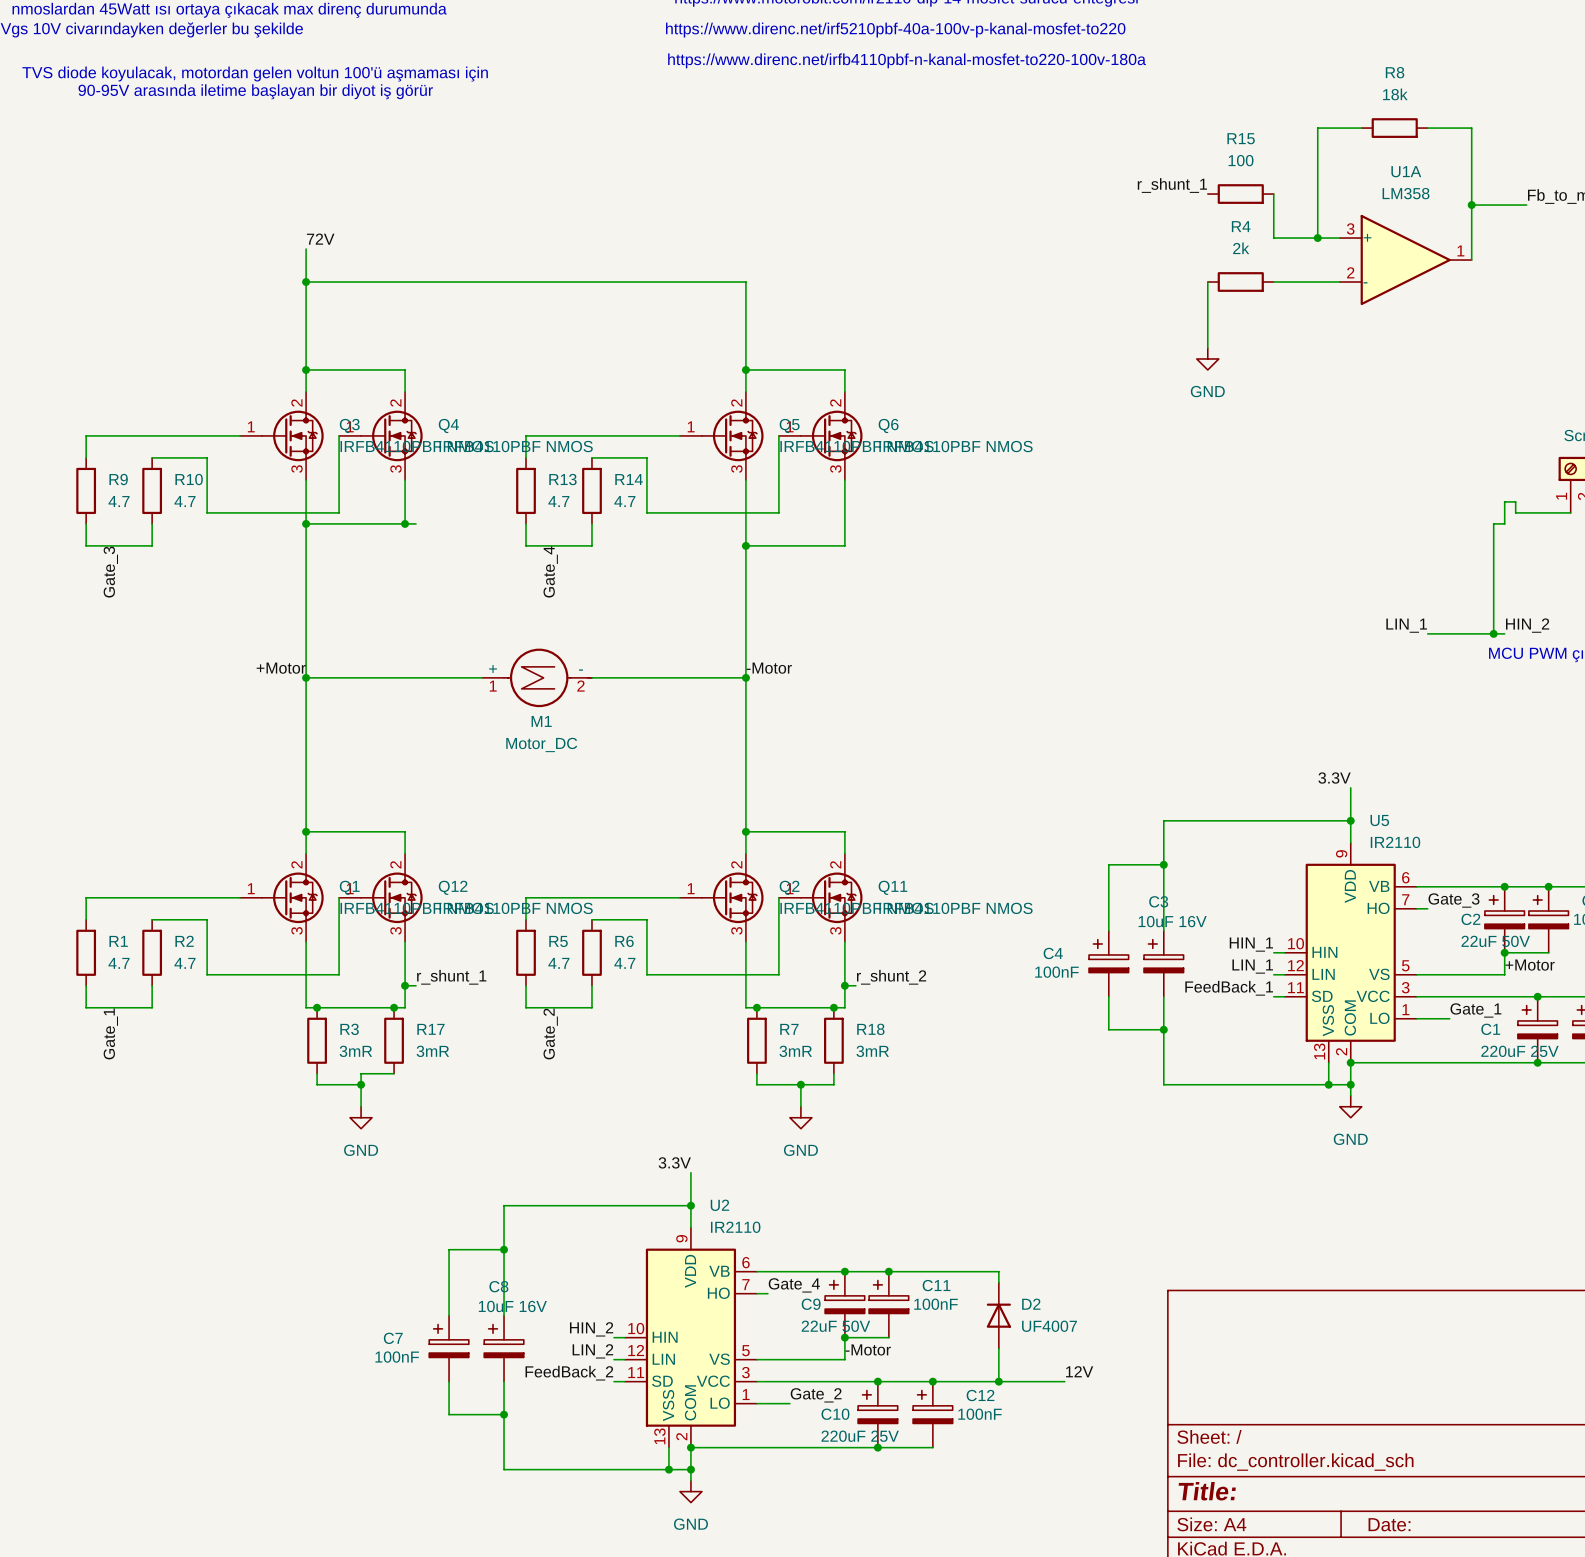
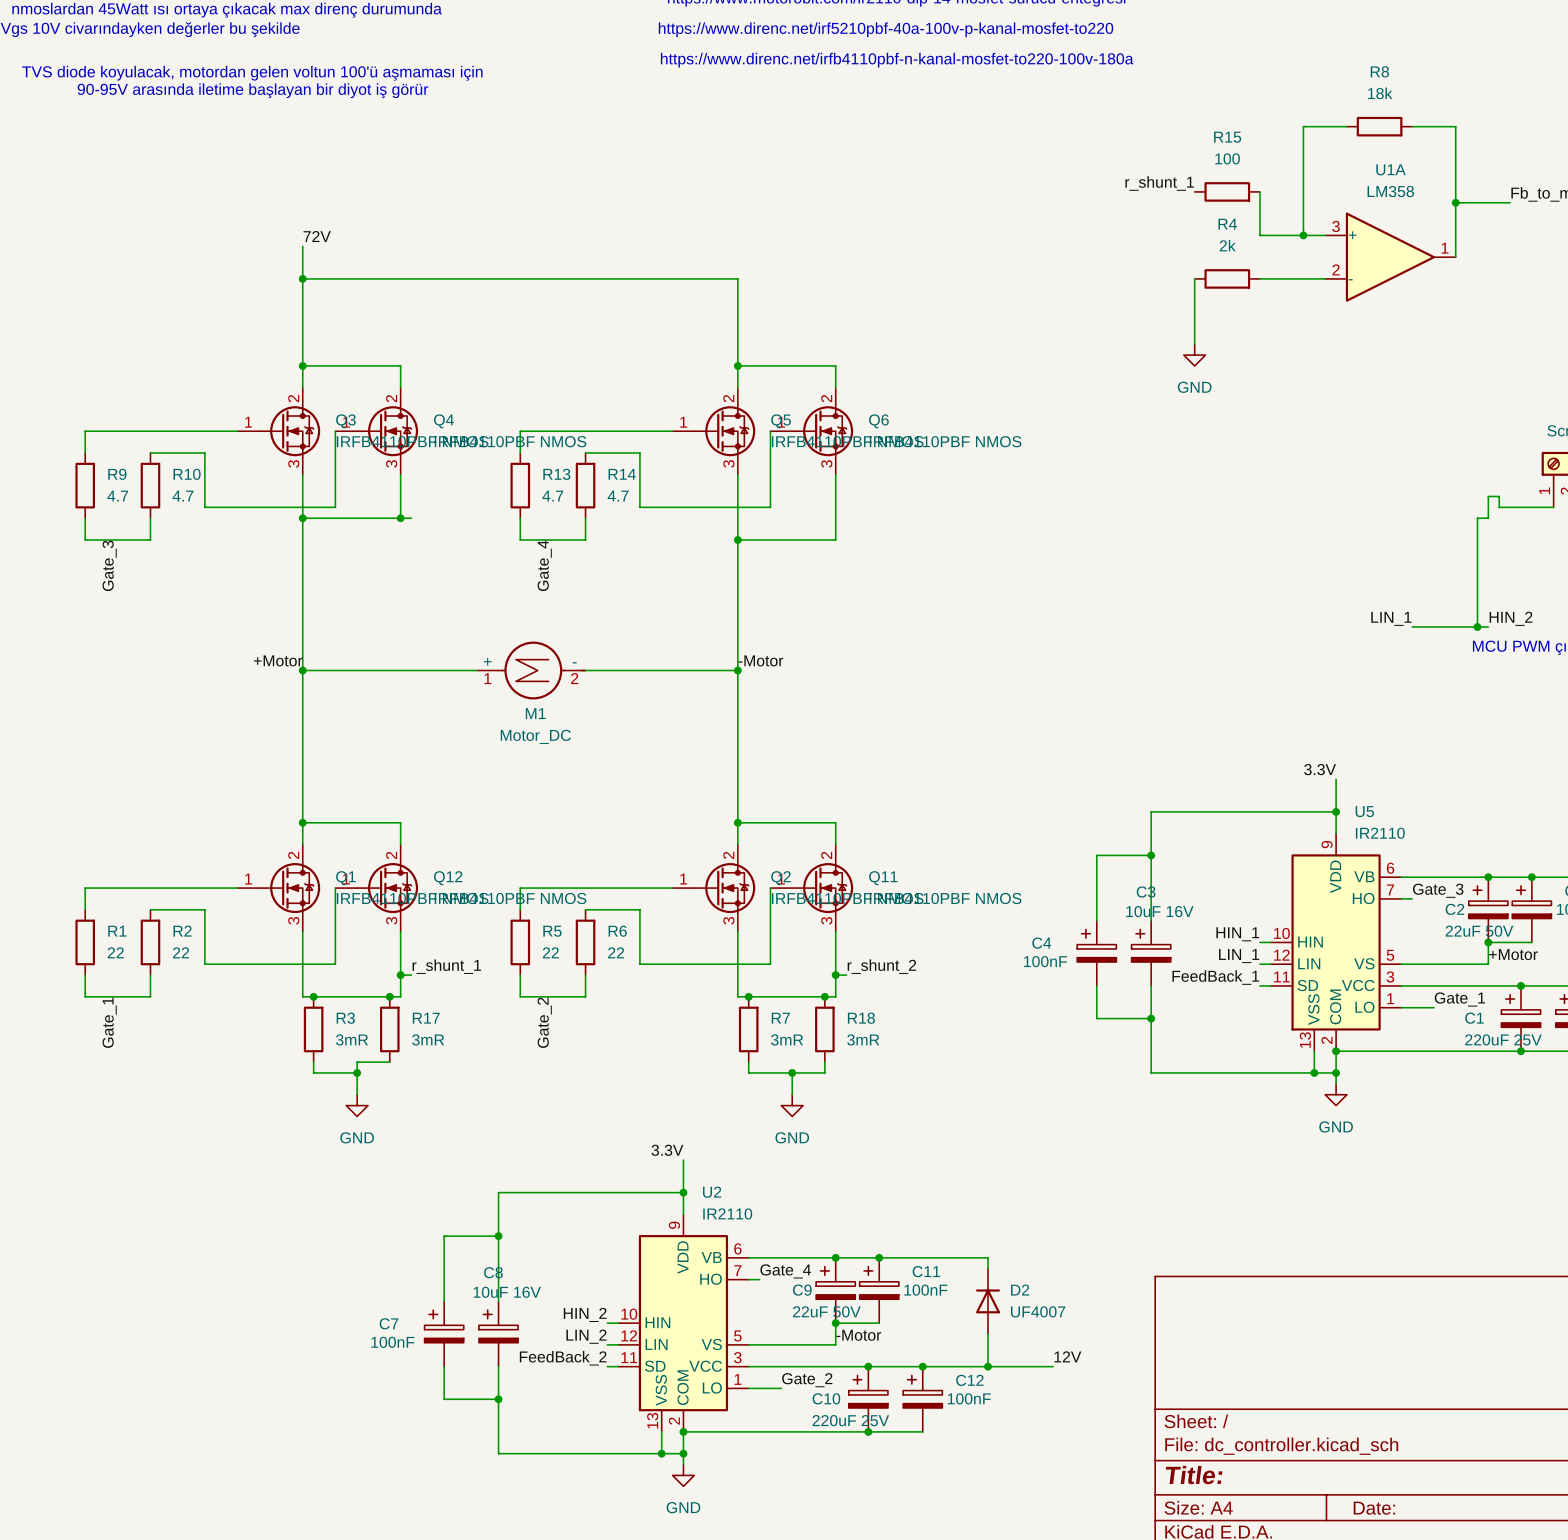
R1 value: 4.7 (119, 963) -> 22 (115, 952)
R2 value: 4.7 (185, 963) -> 22 (181, 952)
R5 value: 4.7 (558, 963) -> 22 (550, 952)
R6 value: 4.7 (624, 963) -> 22 (616, 952)

